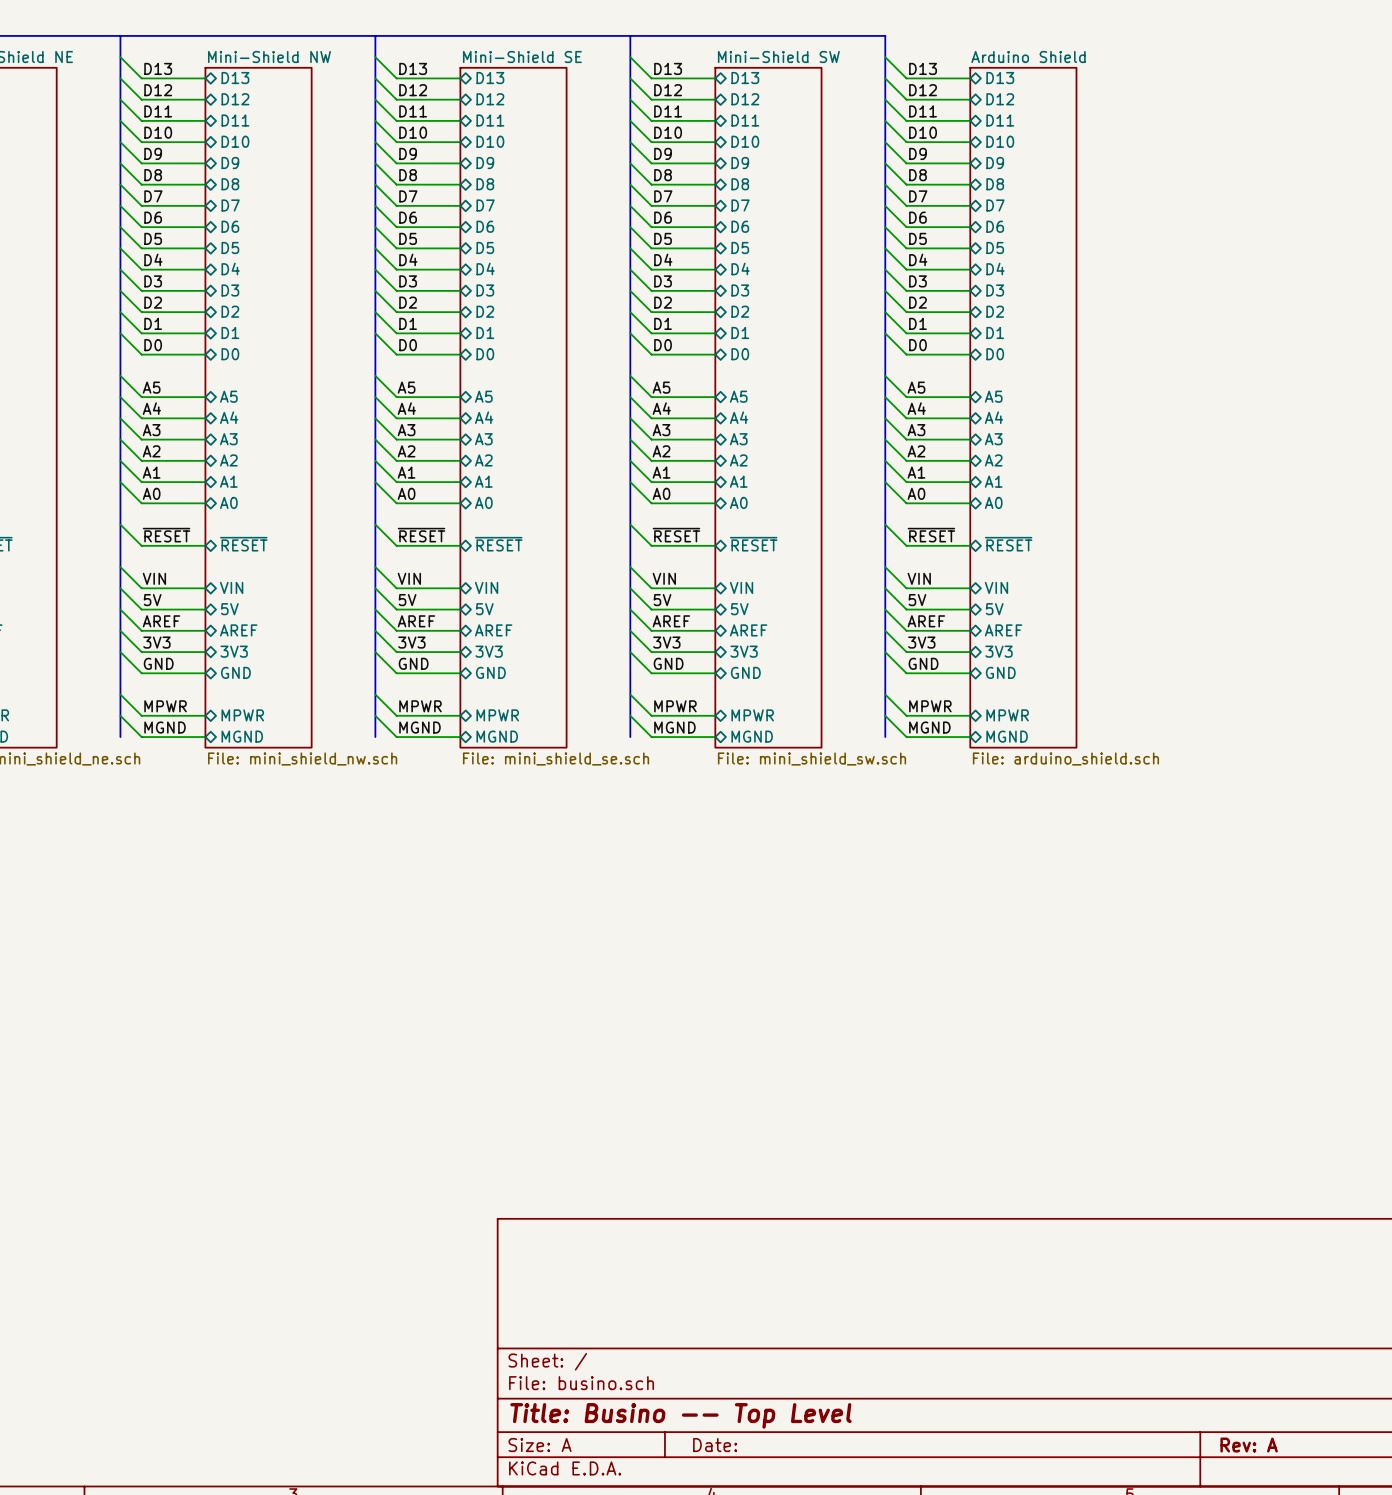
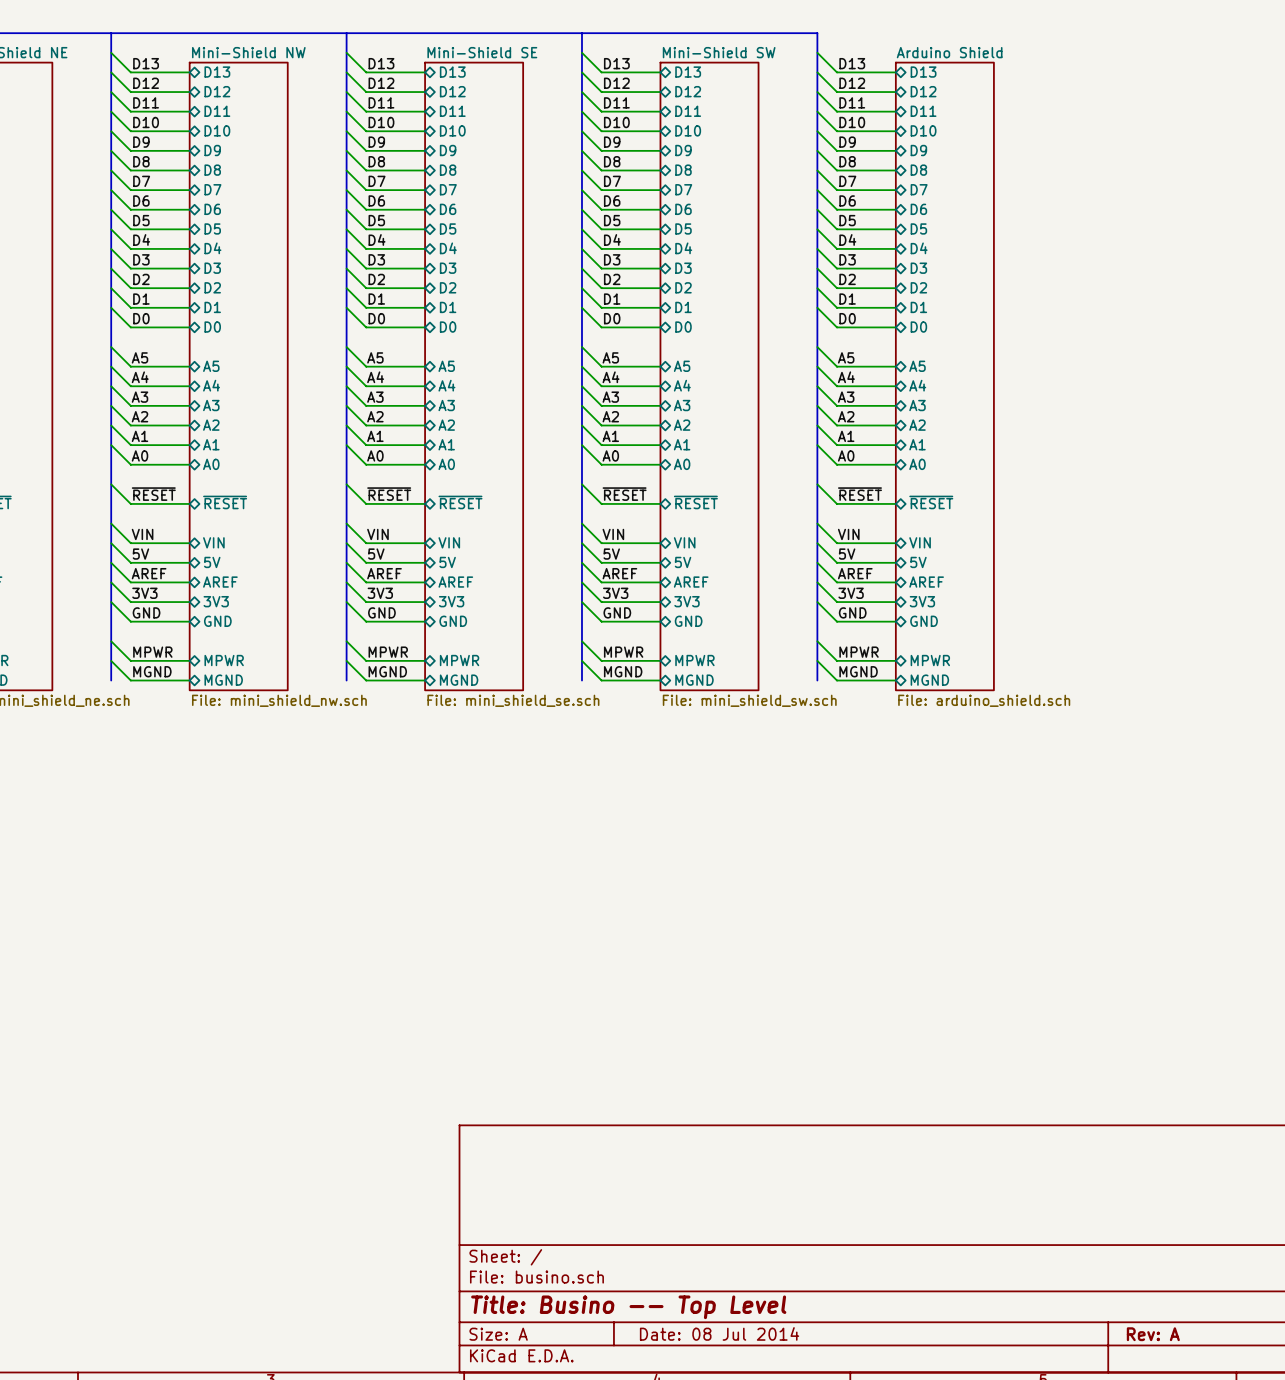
title block: Date: (715, 1445) -> Date: 08 Jul 2014 (719, 1333)

